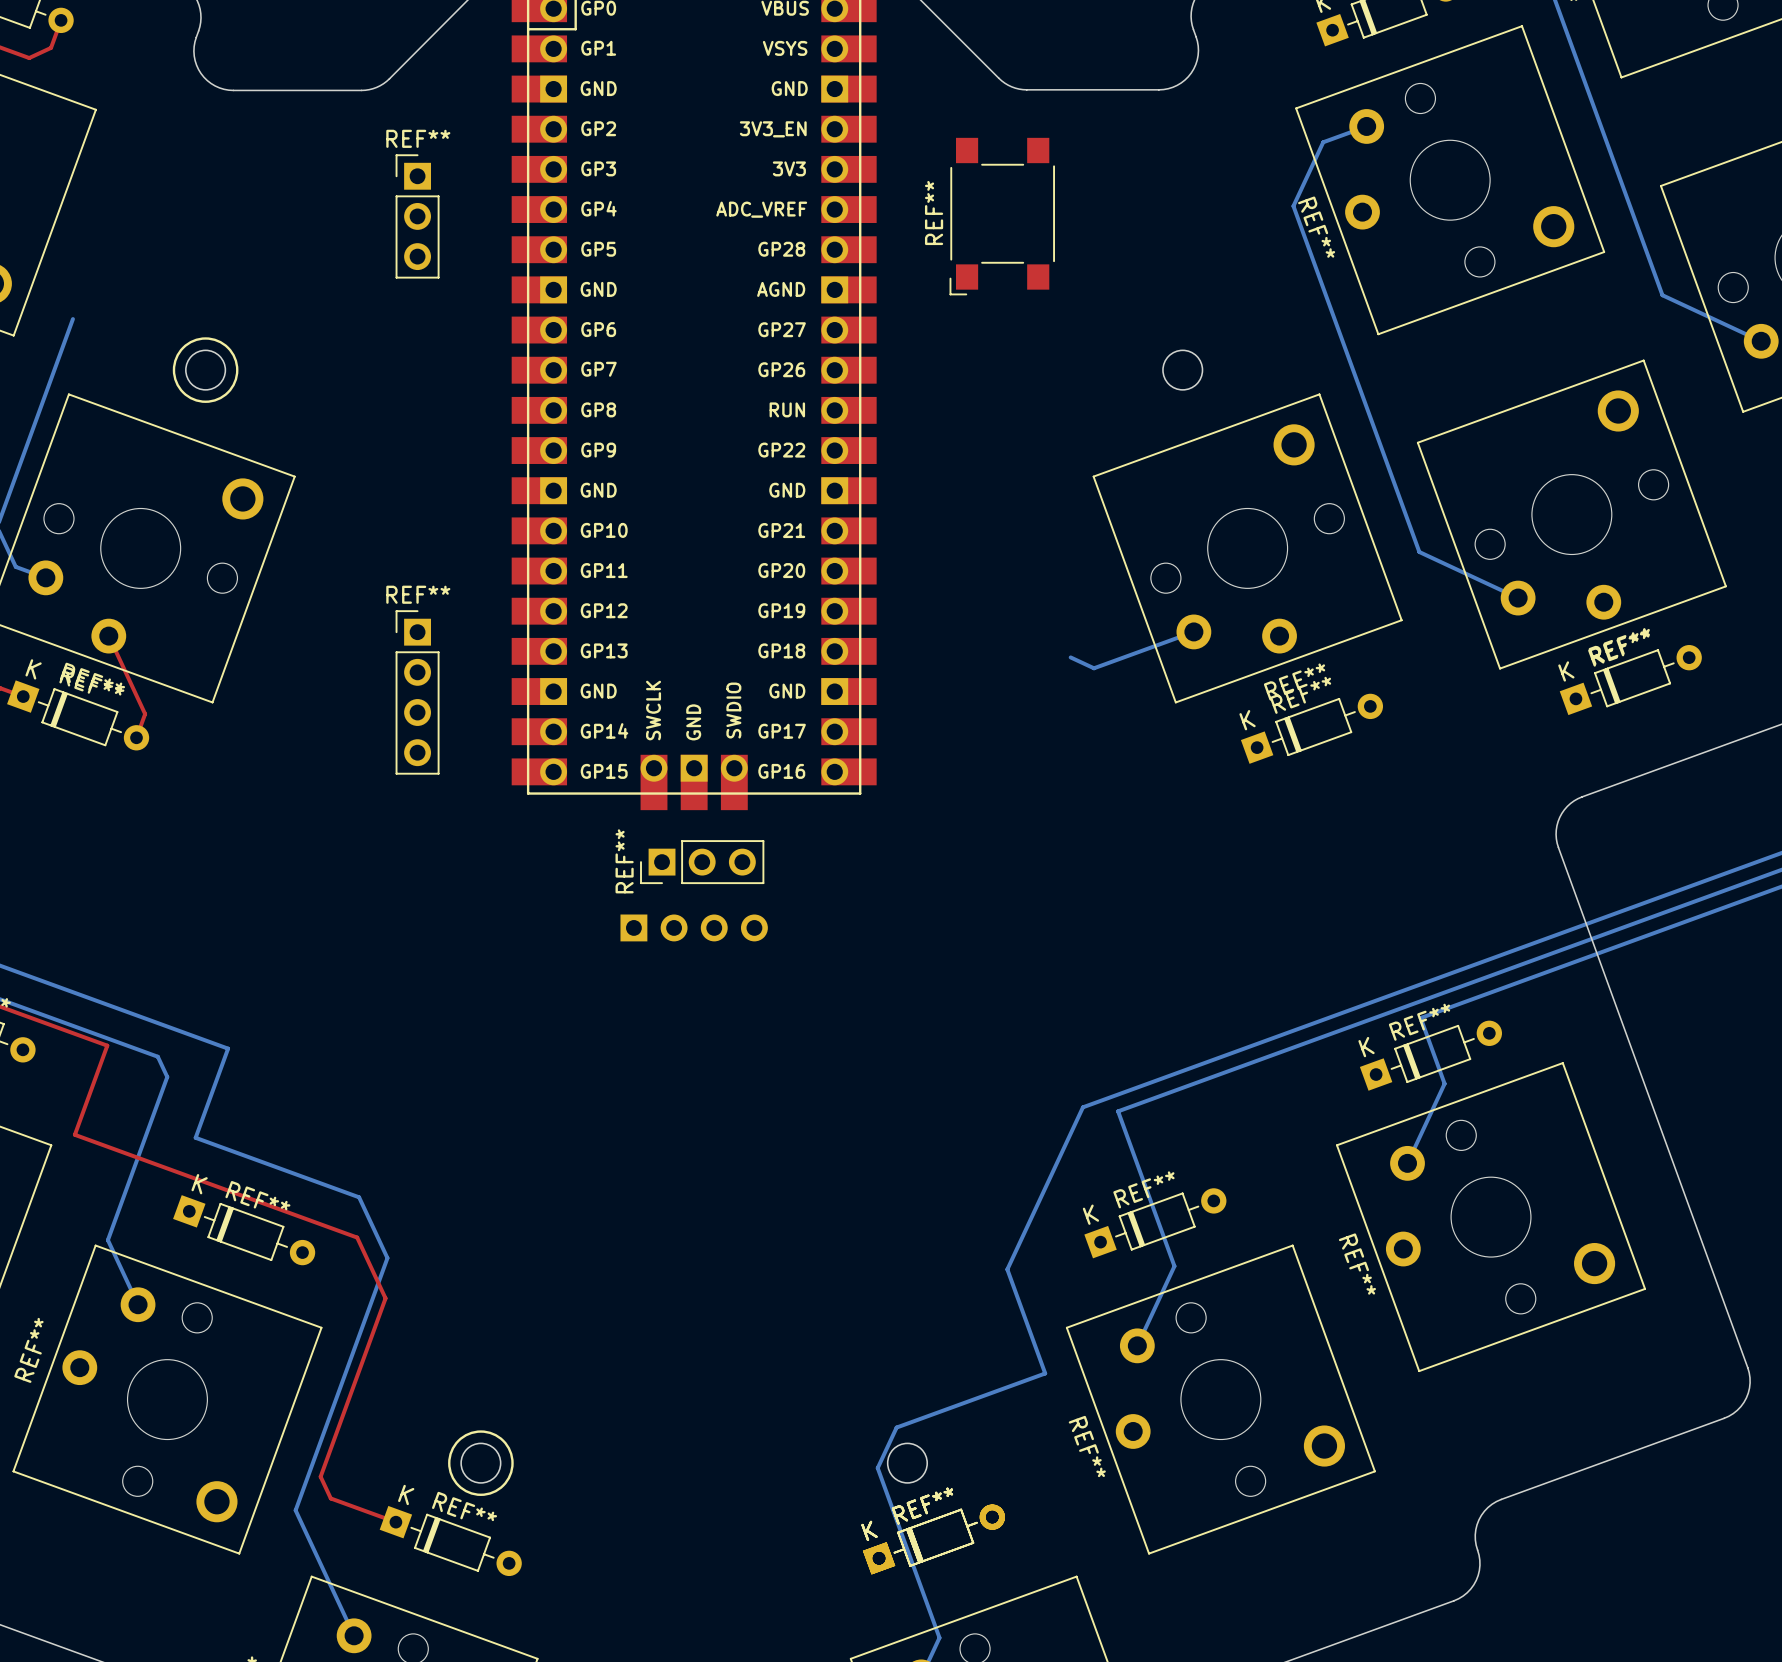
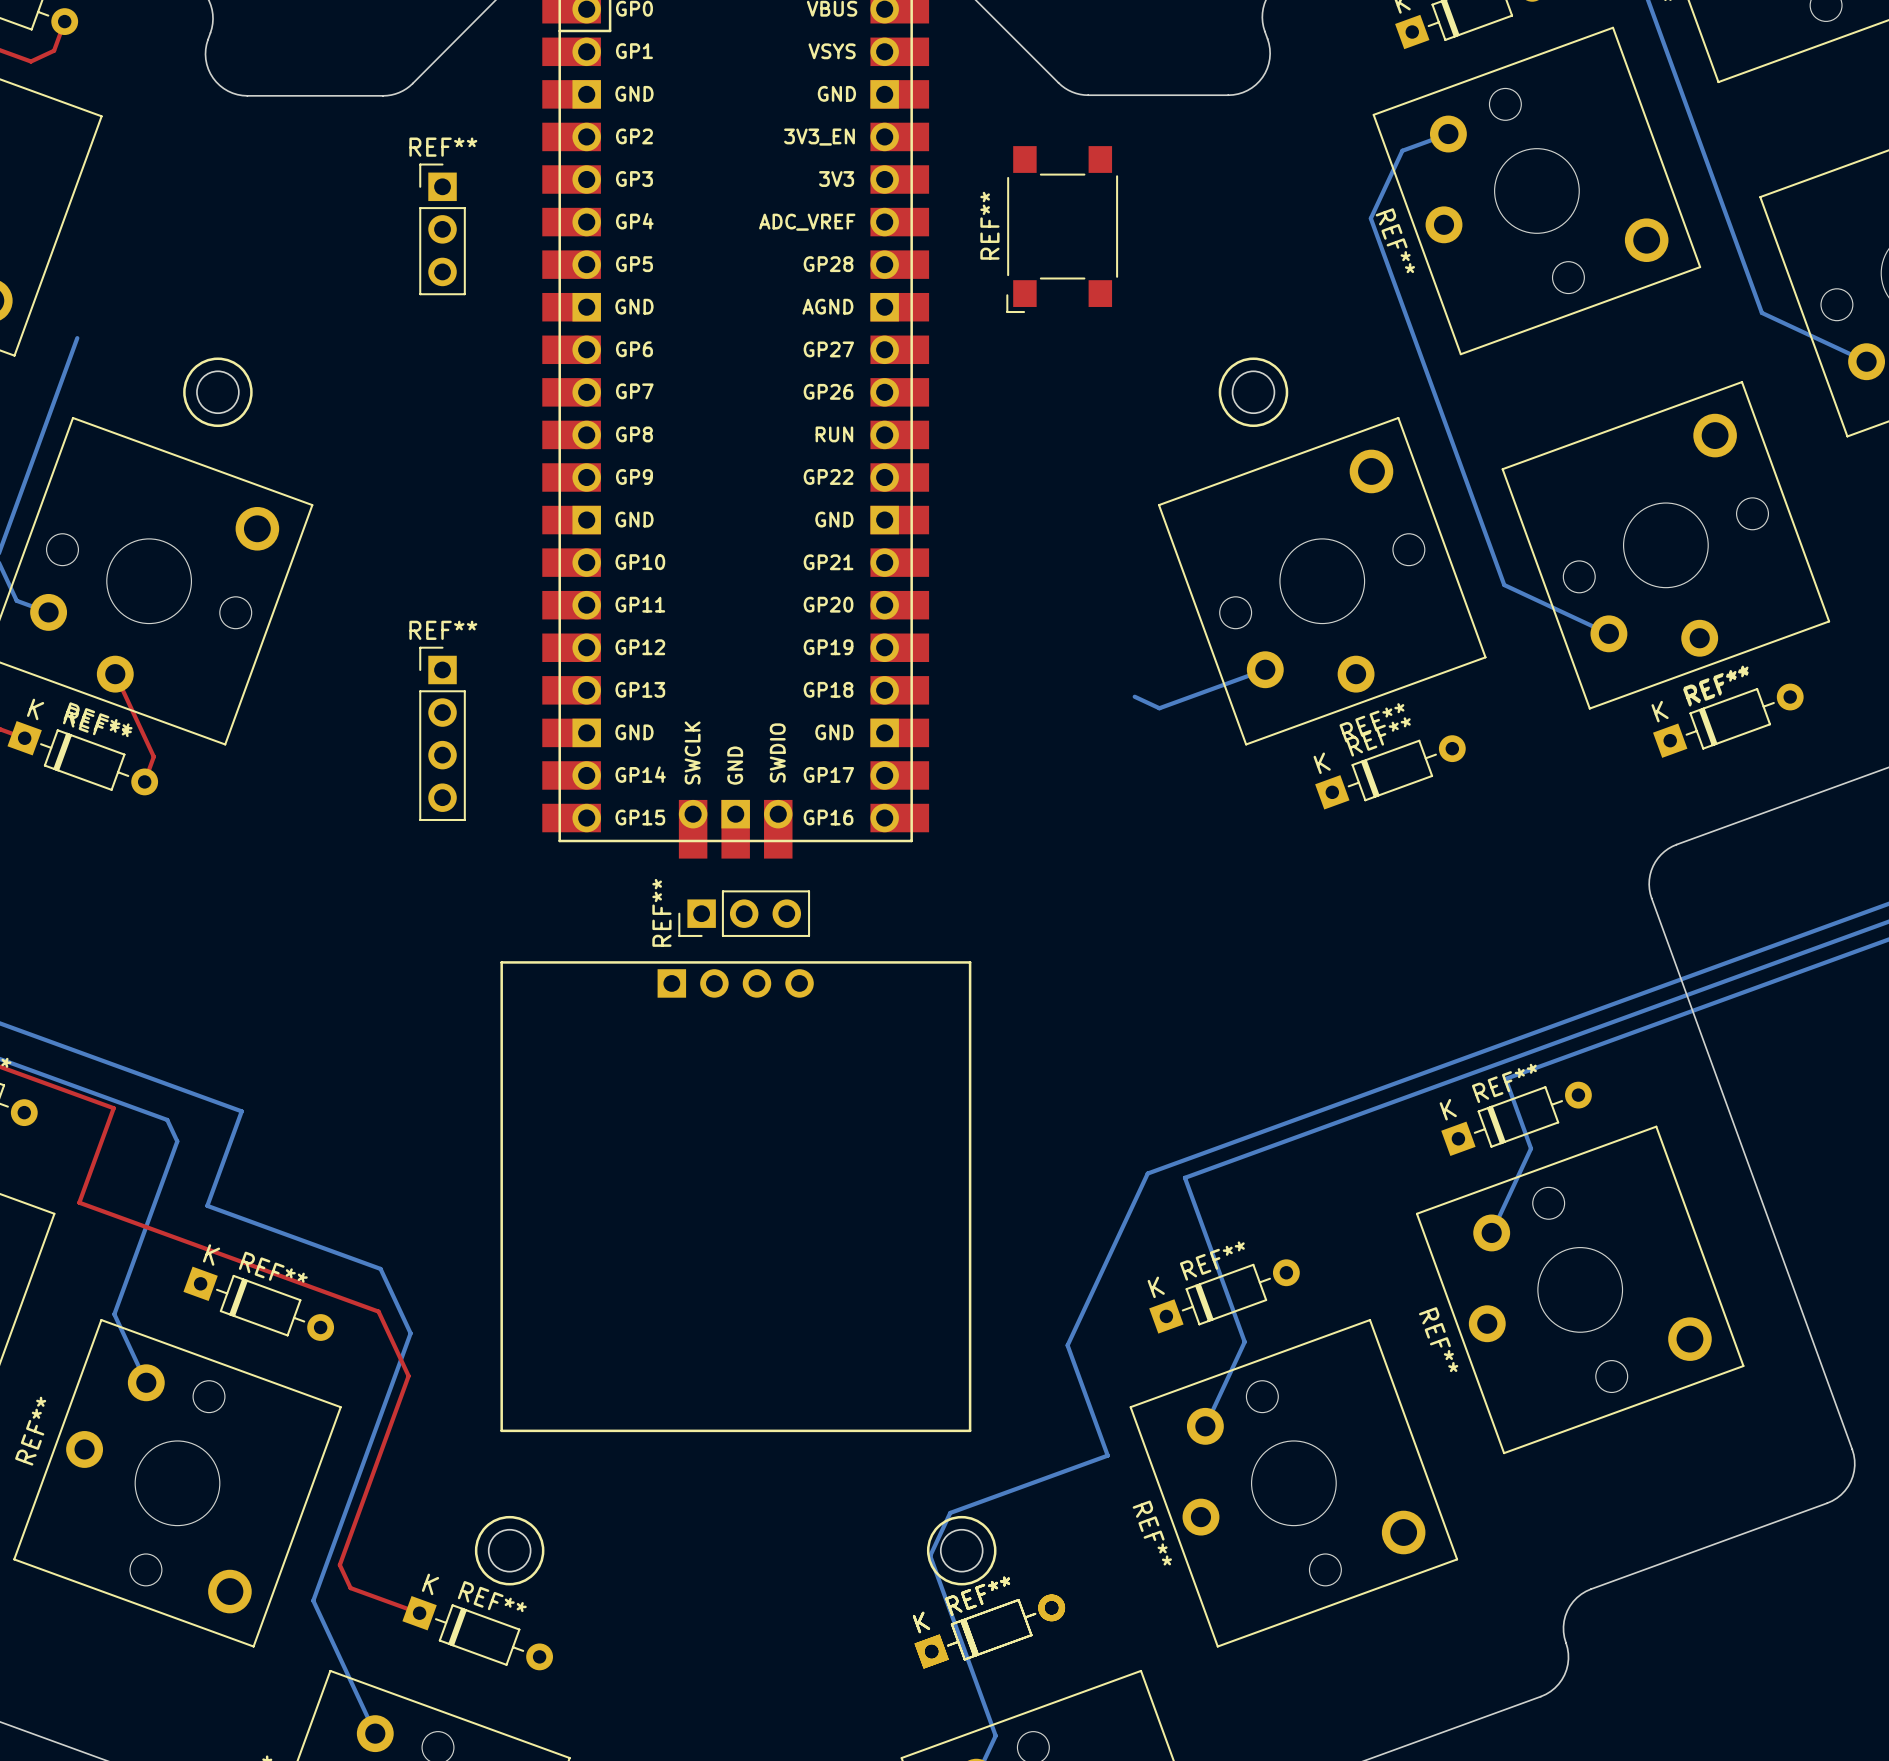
drawing: none -> [1218, 357, 1289, 428]
line: none -> (501, 962) (970, 962) (970, 1430) (501, 1430) (501, 962)
drawing: none -> [926, 1515, 997, 1586]

